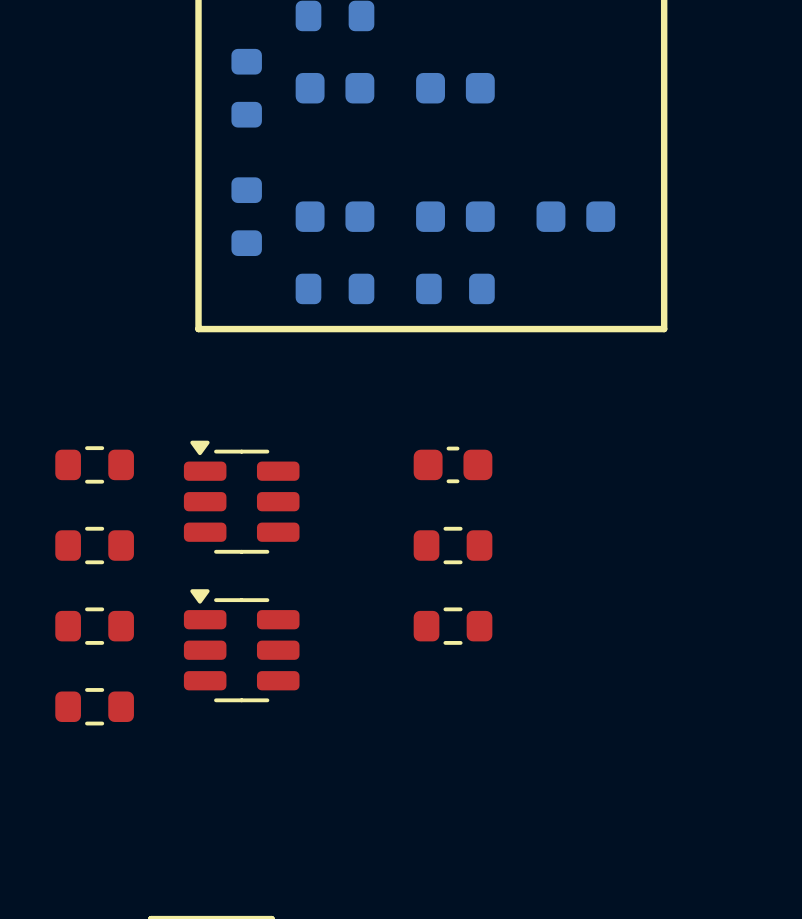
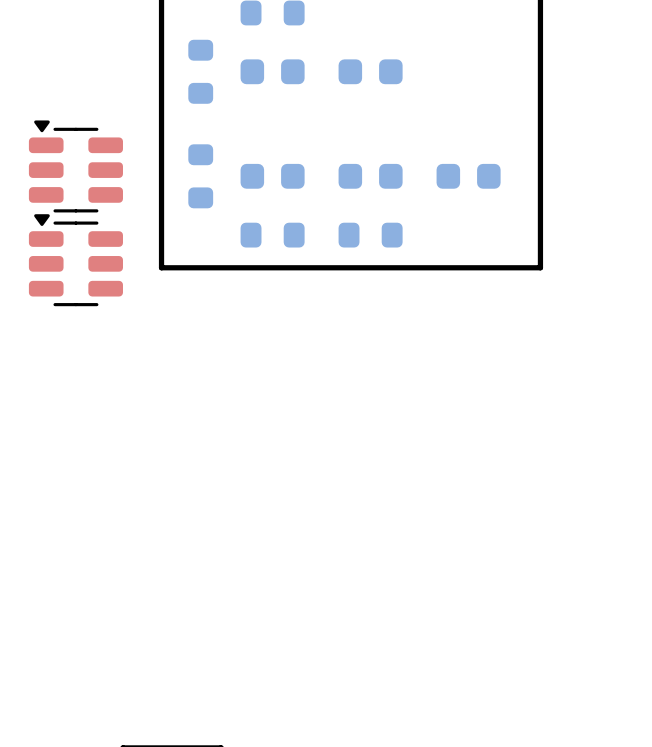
part: none -> (75, 166)
part: none -> (75, 260)
part: (94, 464) -> none
part: (453, 464) -> none
part: (241, 497) -> none
part: (94, 545) -> none
part: (453, 545) -> none
part: (94, 626) -> none
part: (453, 626) -> none
part: (241, 645) -> none
part: (94, 706) -> none

